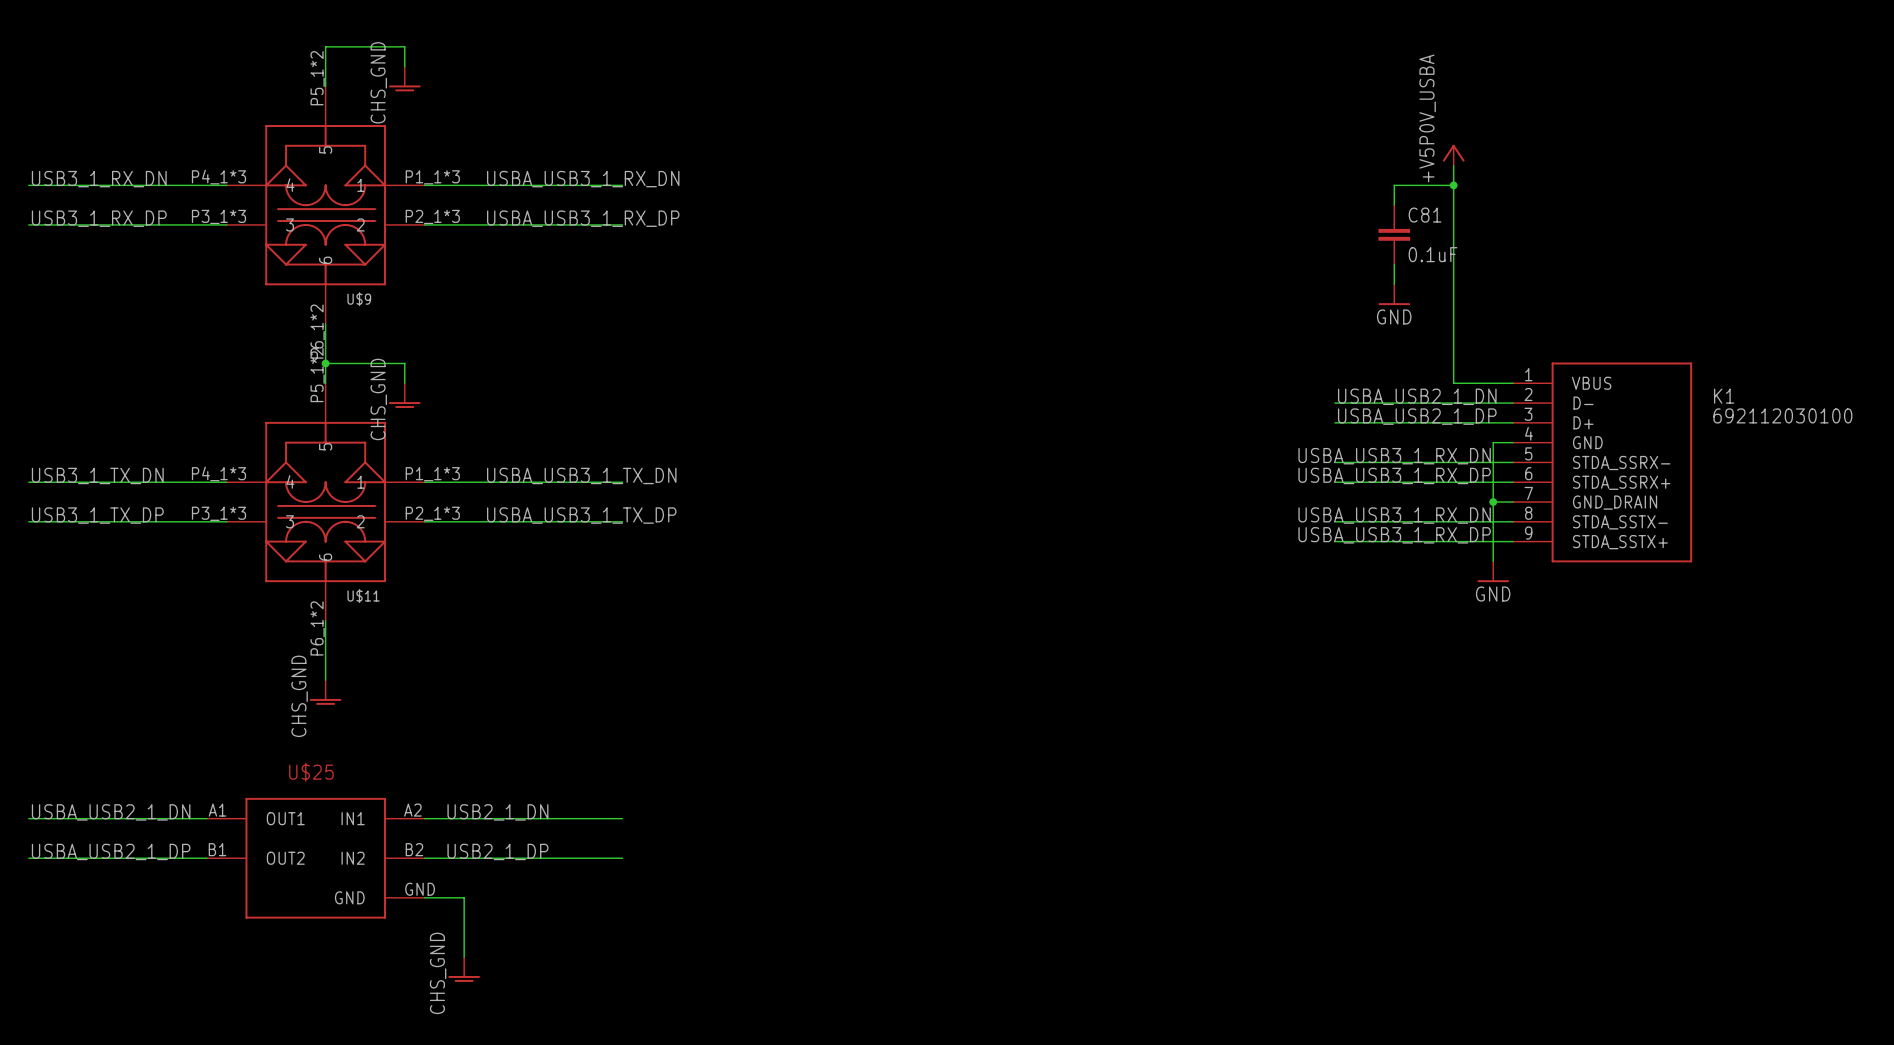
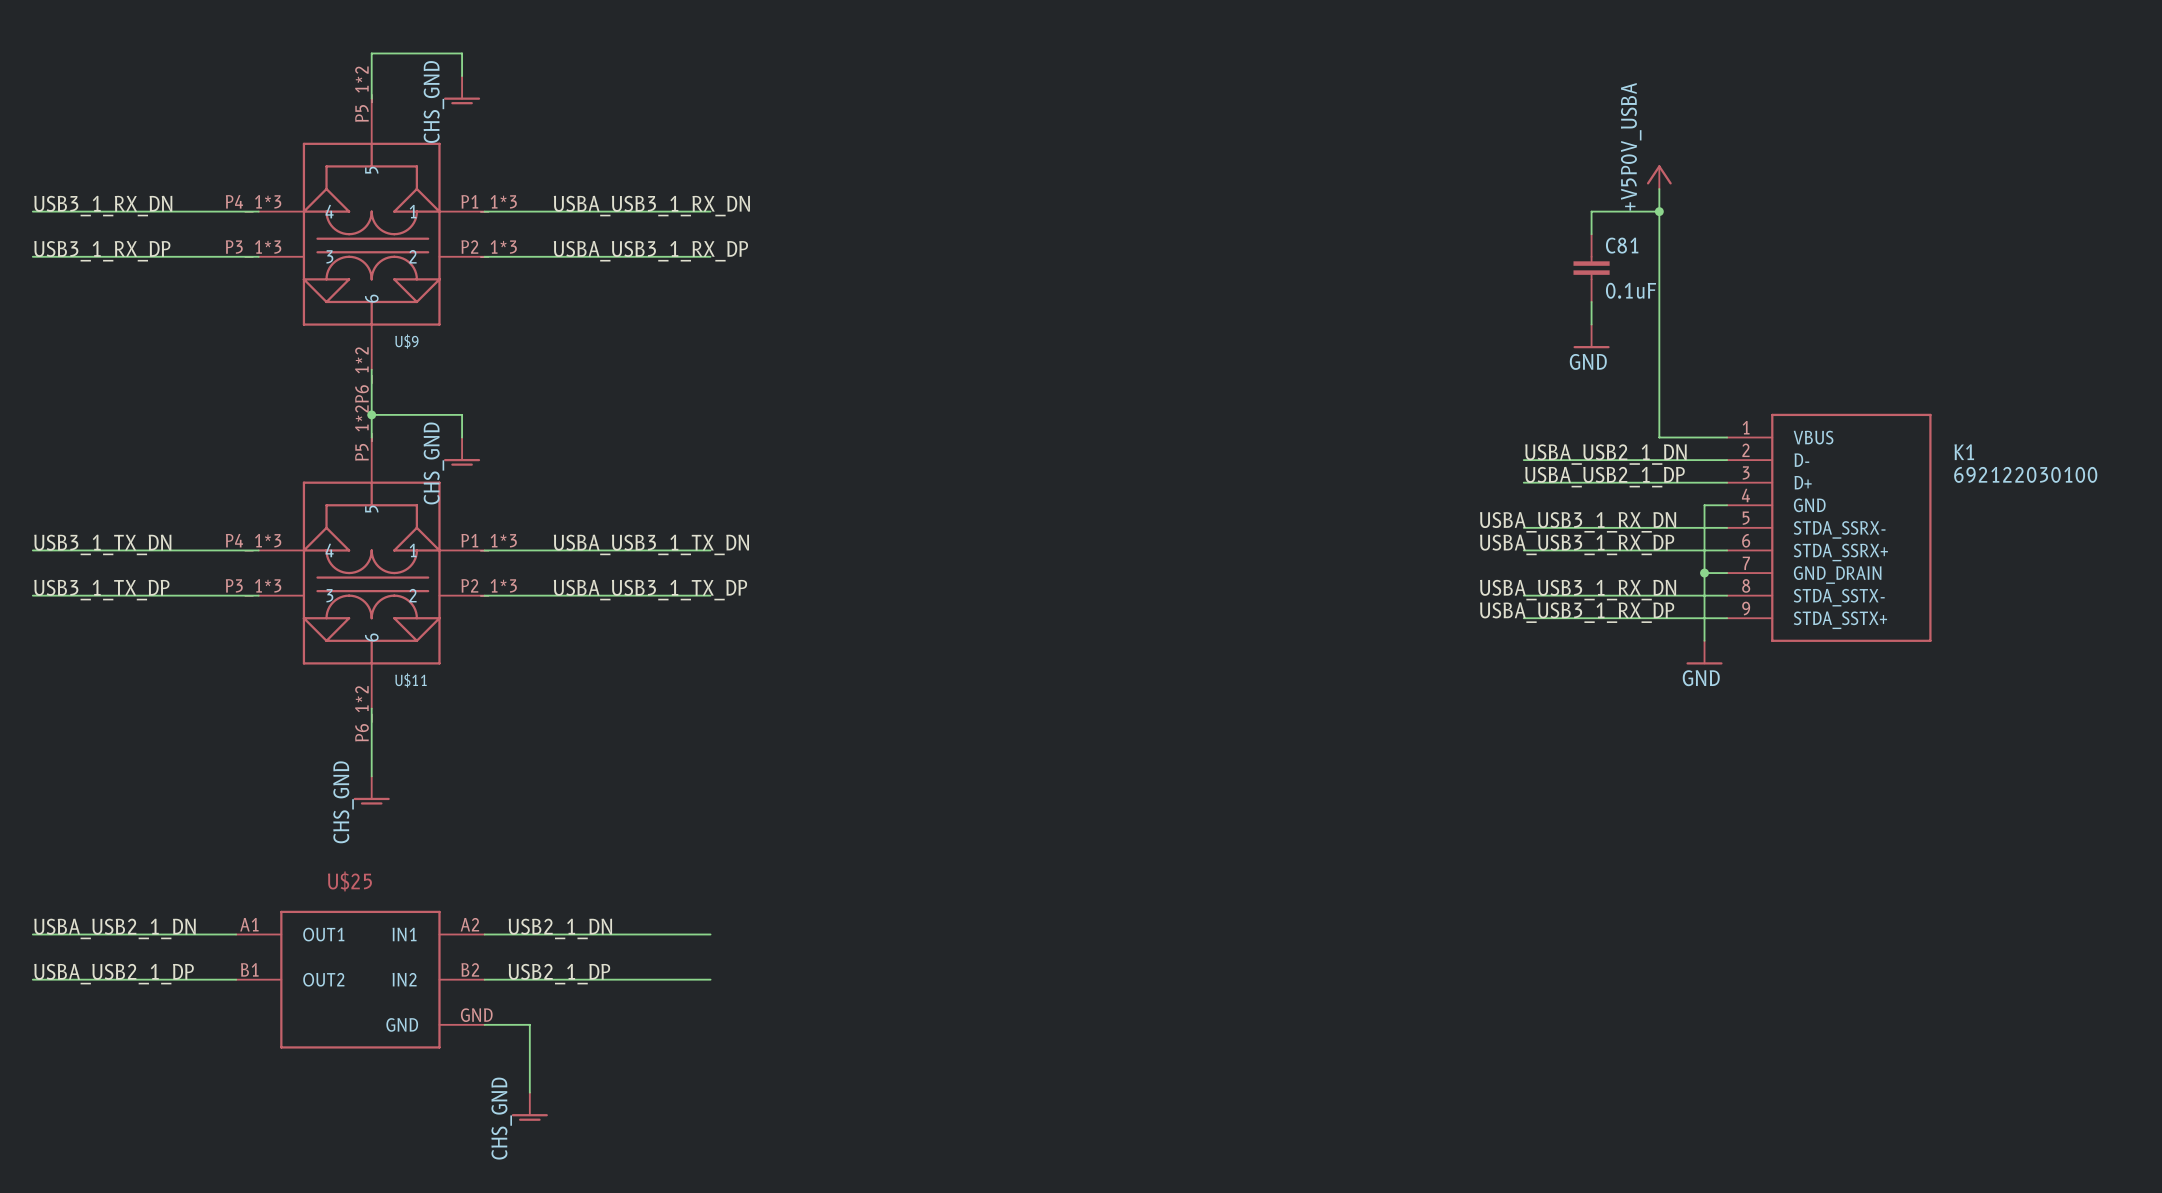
K1 value: 692112030100 (1782, 415) -> 692122030100 (2025, 474)

